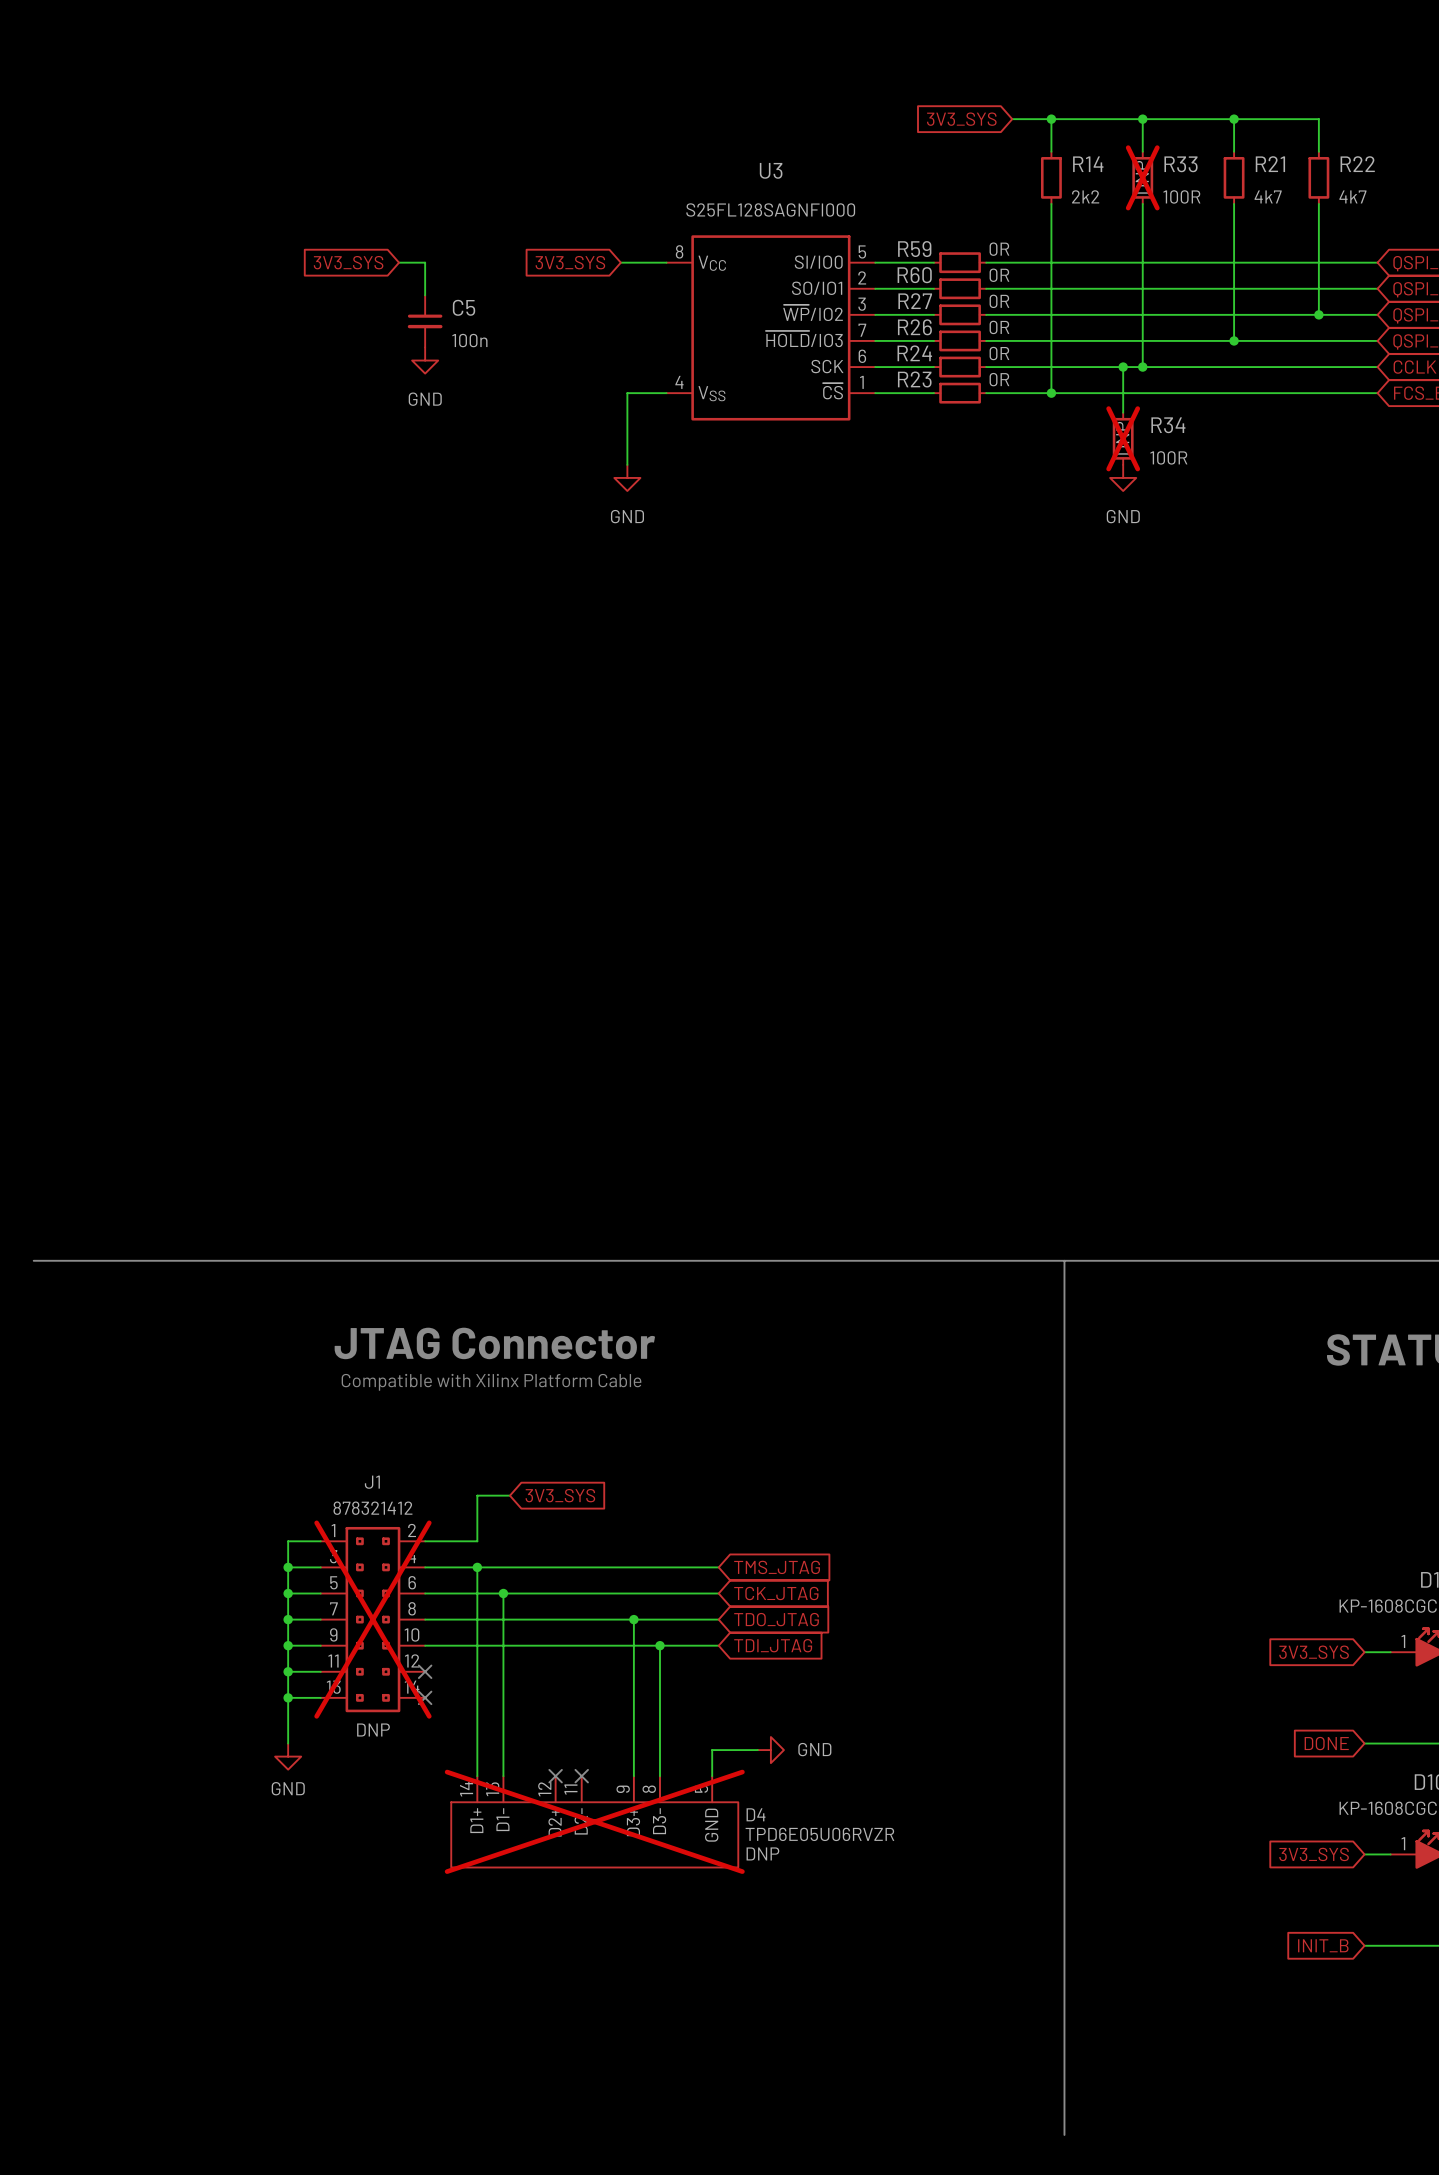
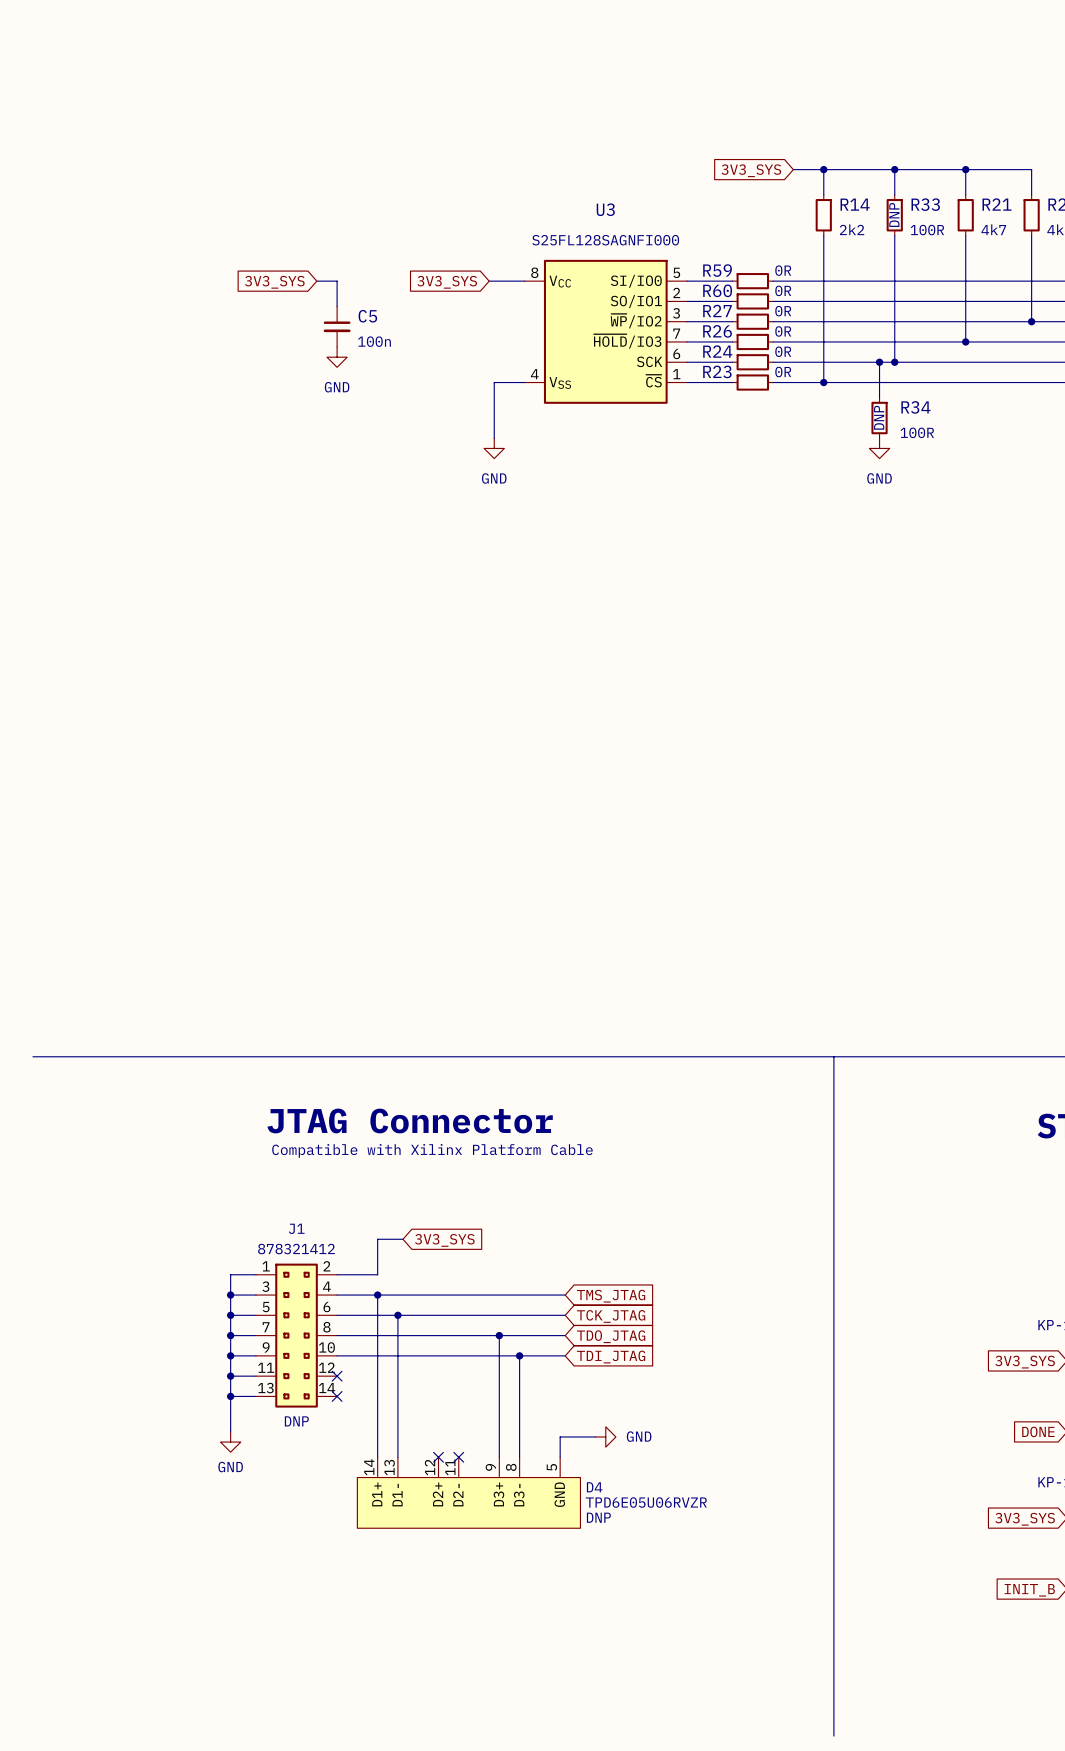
R33 do-not-place cross: (1142, 177) -> none
R34 do-not-place cross: (1123, 438) -> none
J1 do-not-place cross: (372, 1619) -> none
D4 do-not-place cross: (594, 1821) -> none

